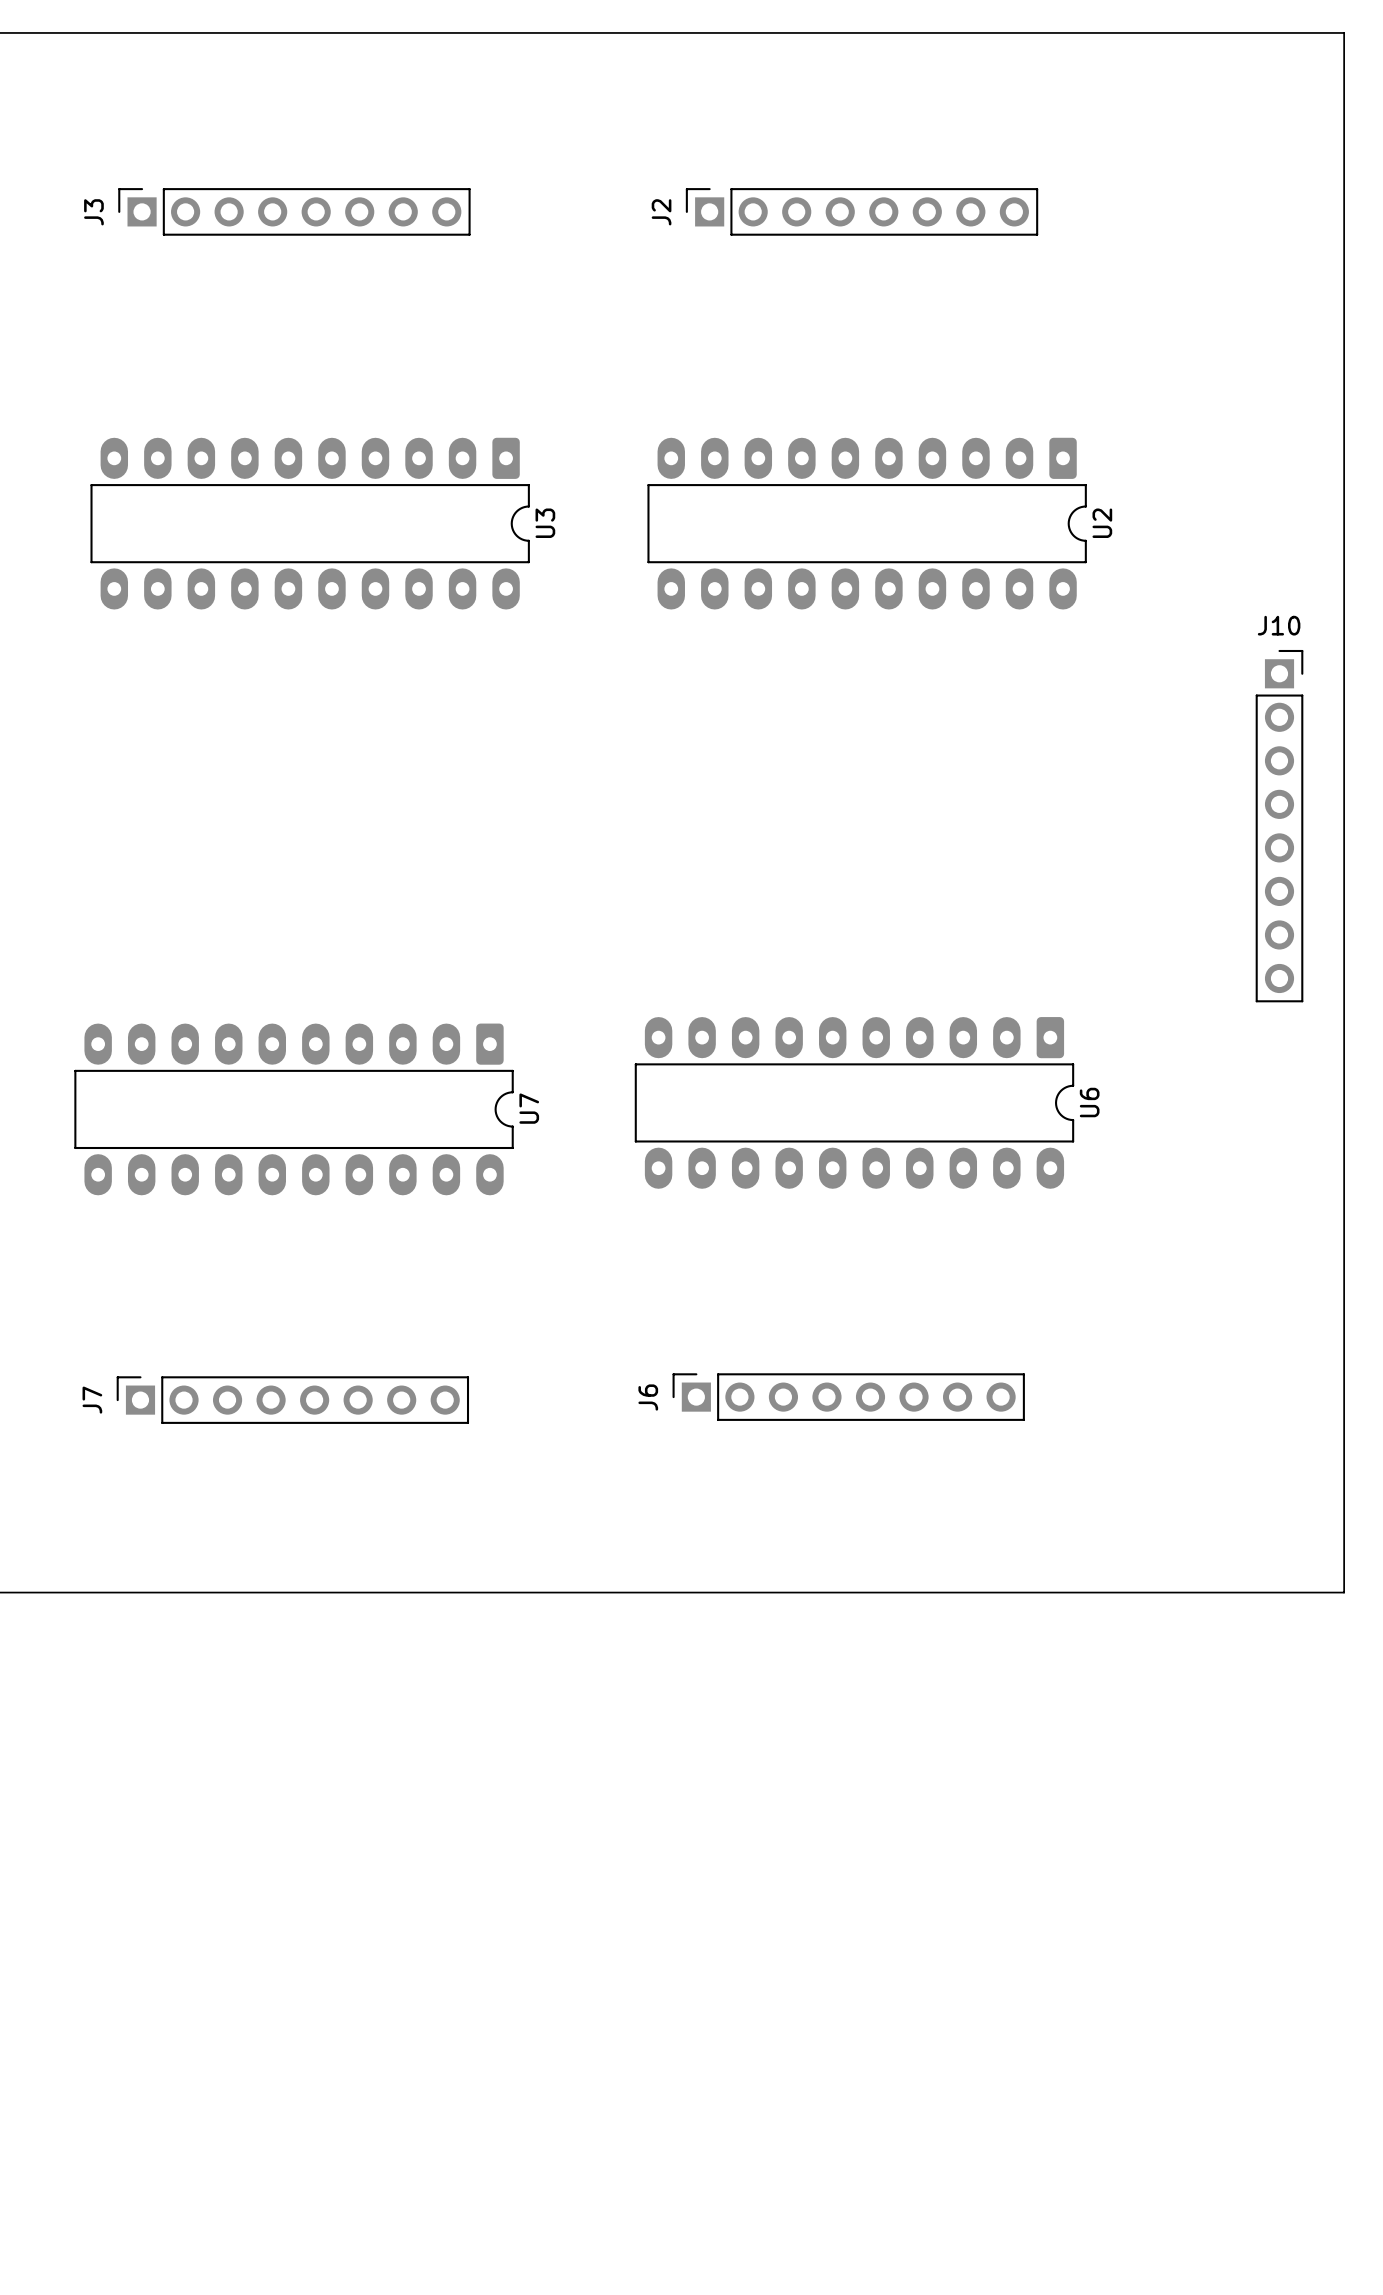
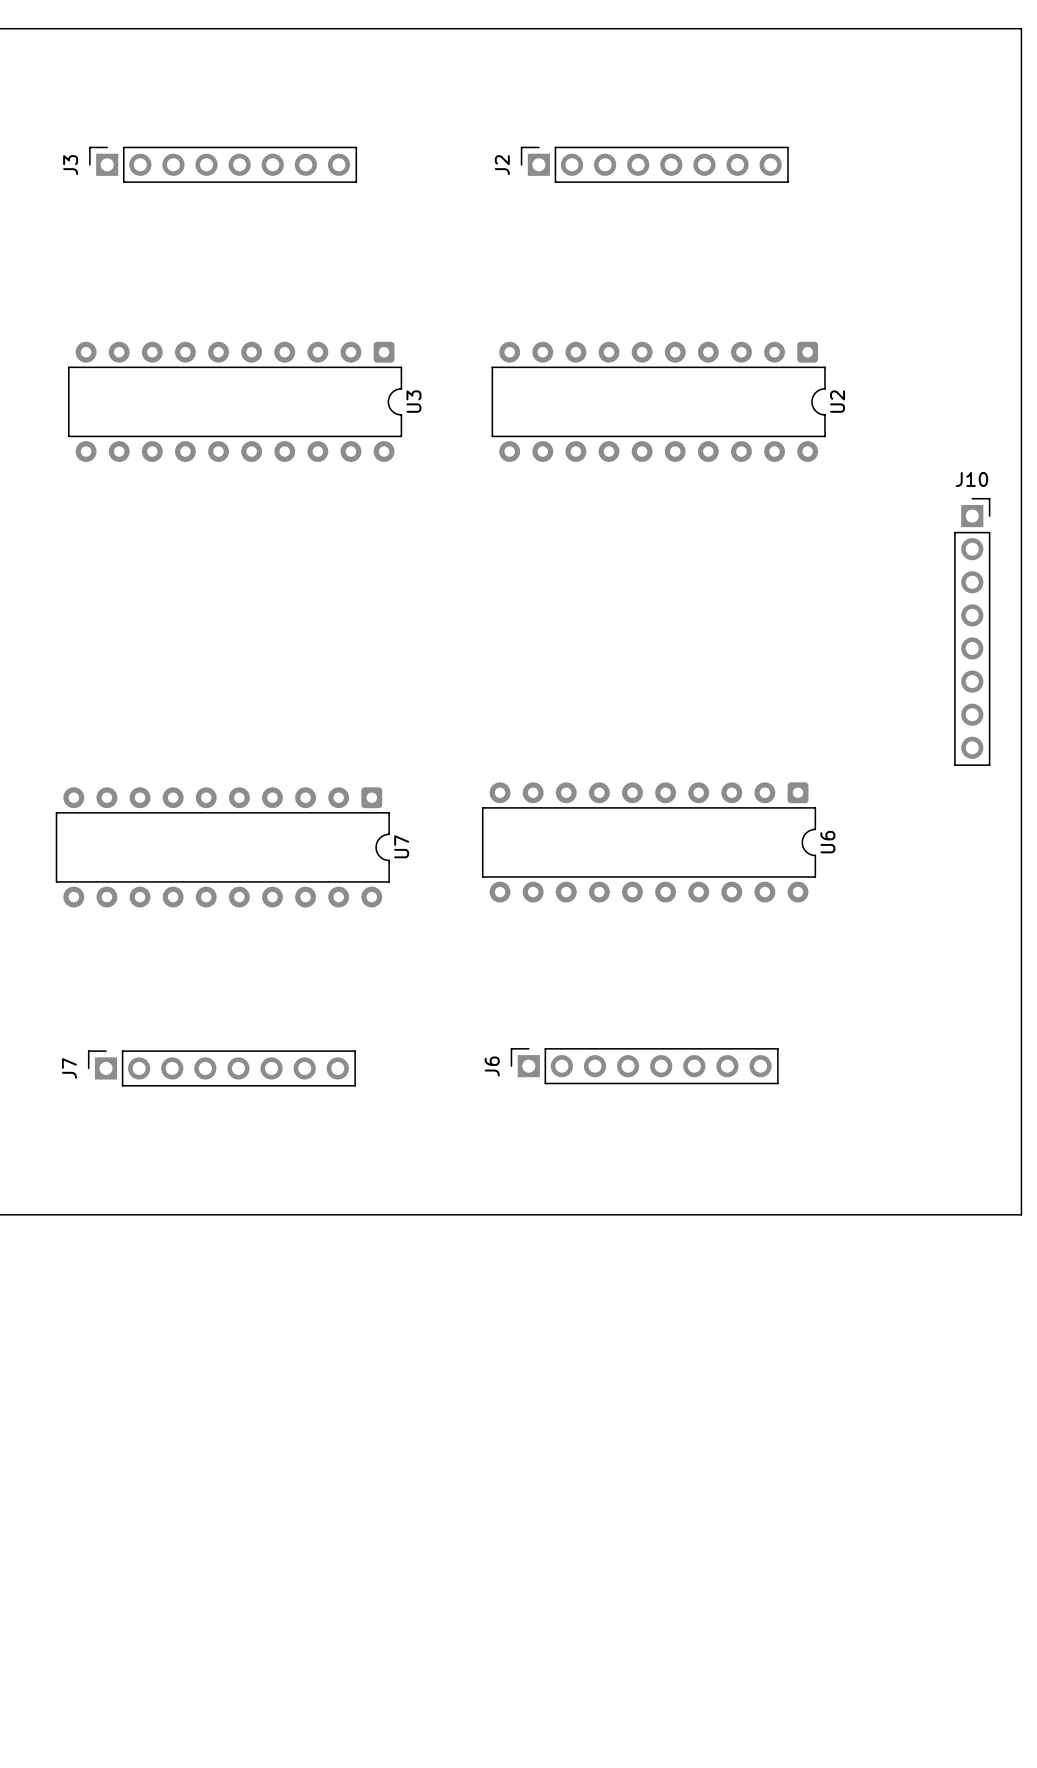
U3 footprint: [90, 437, 530, 610] -> [67, 341, 403, 462]
U2 footprint: [647, 437, 1087, 610] -> [491, 341, 826, 462]
U6 footprint: [634, 1017, 1075, 1189] -> [481, 782, 817, 903]
U7 footprint: [74, 1023, 514, 1196] -> [55, 787, 390, 908]

